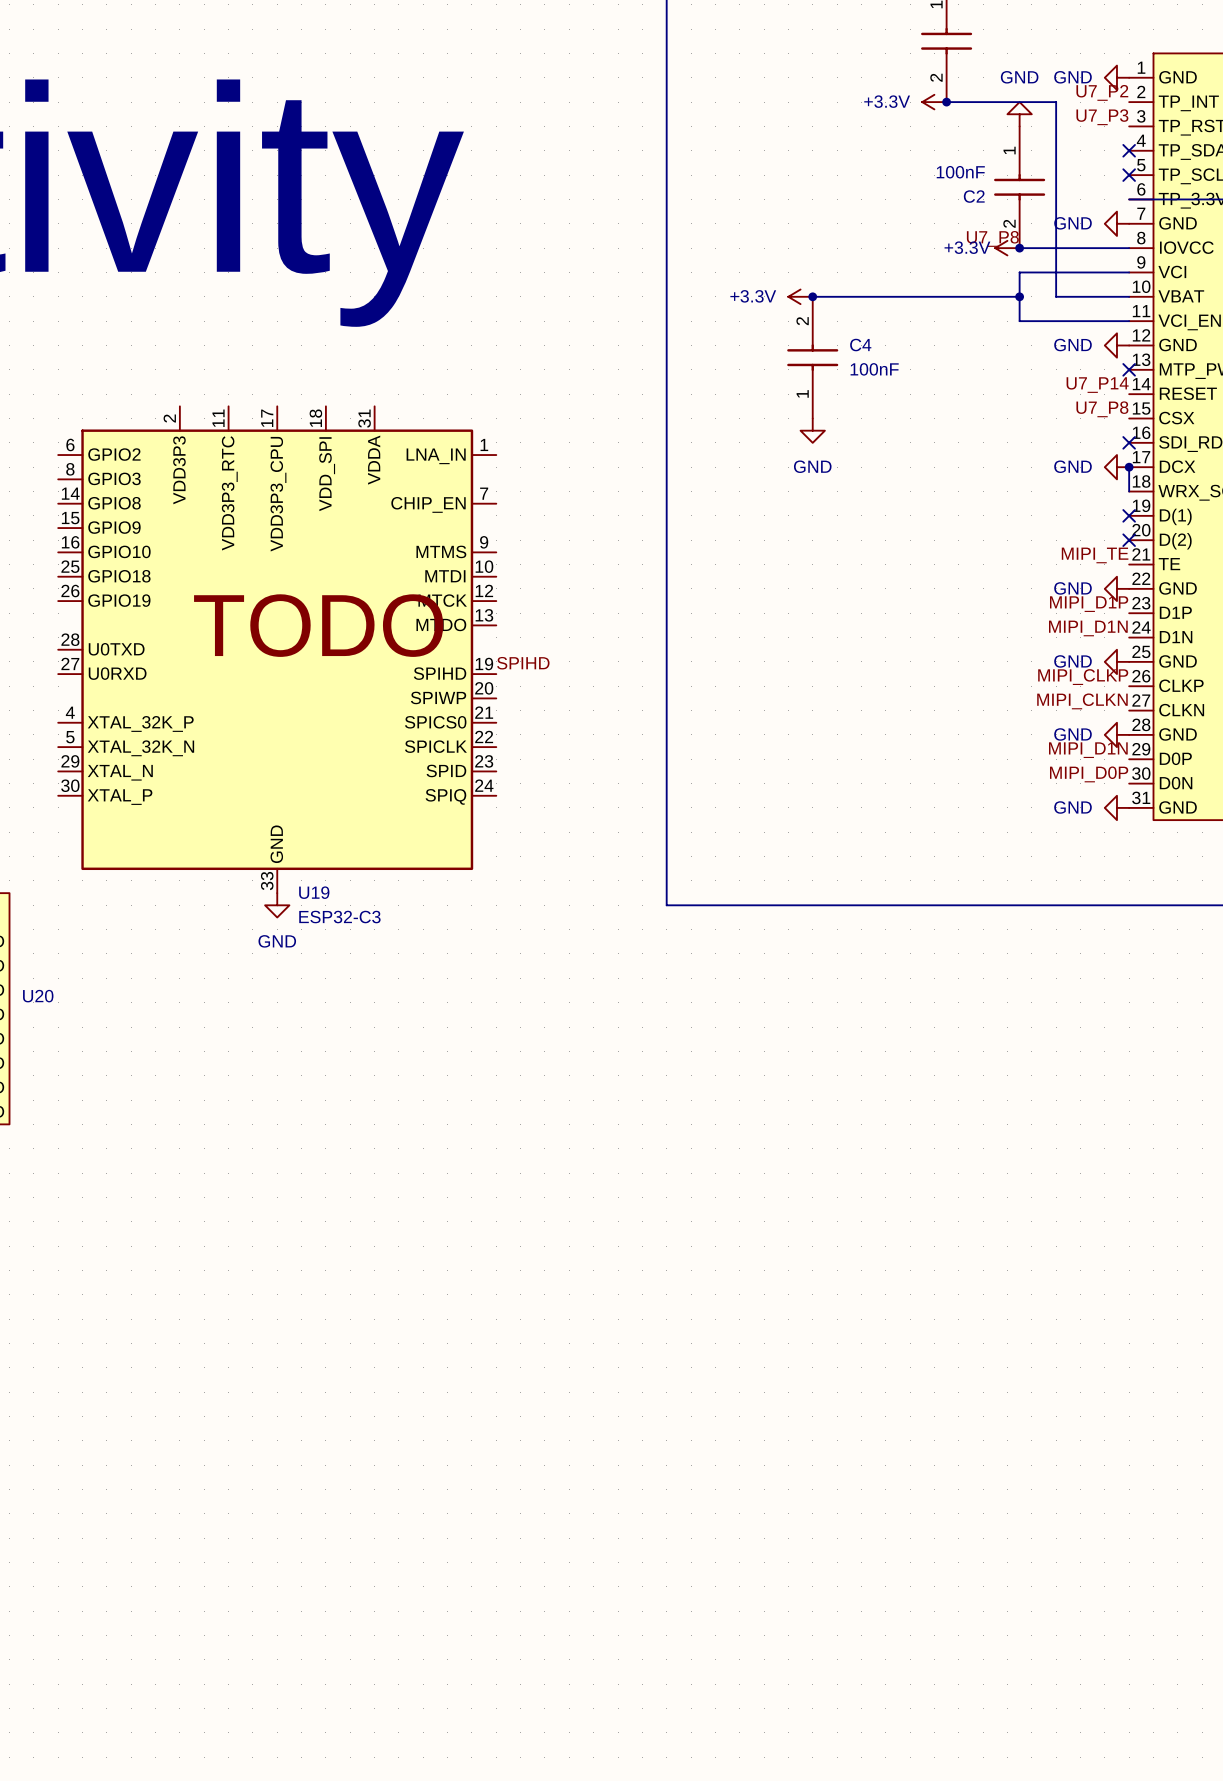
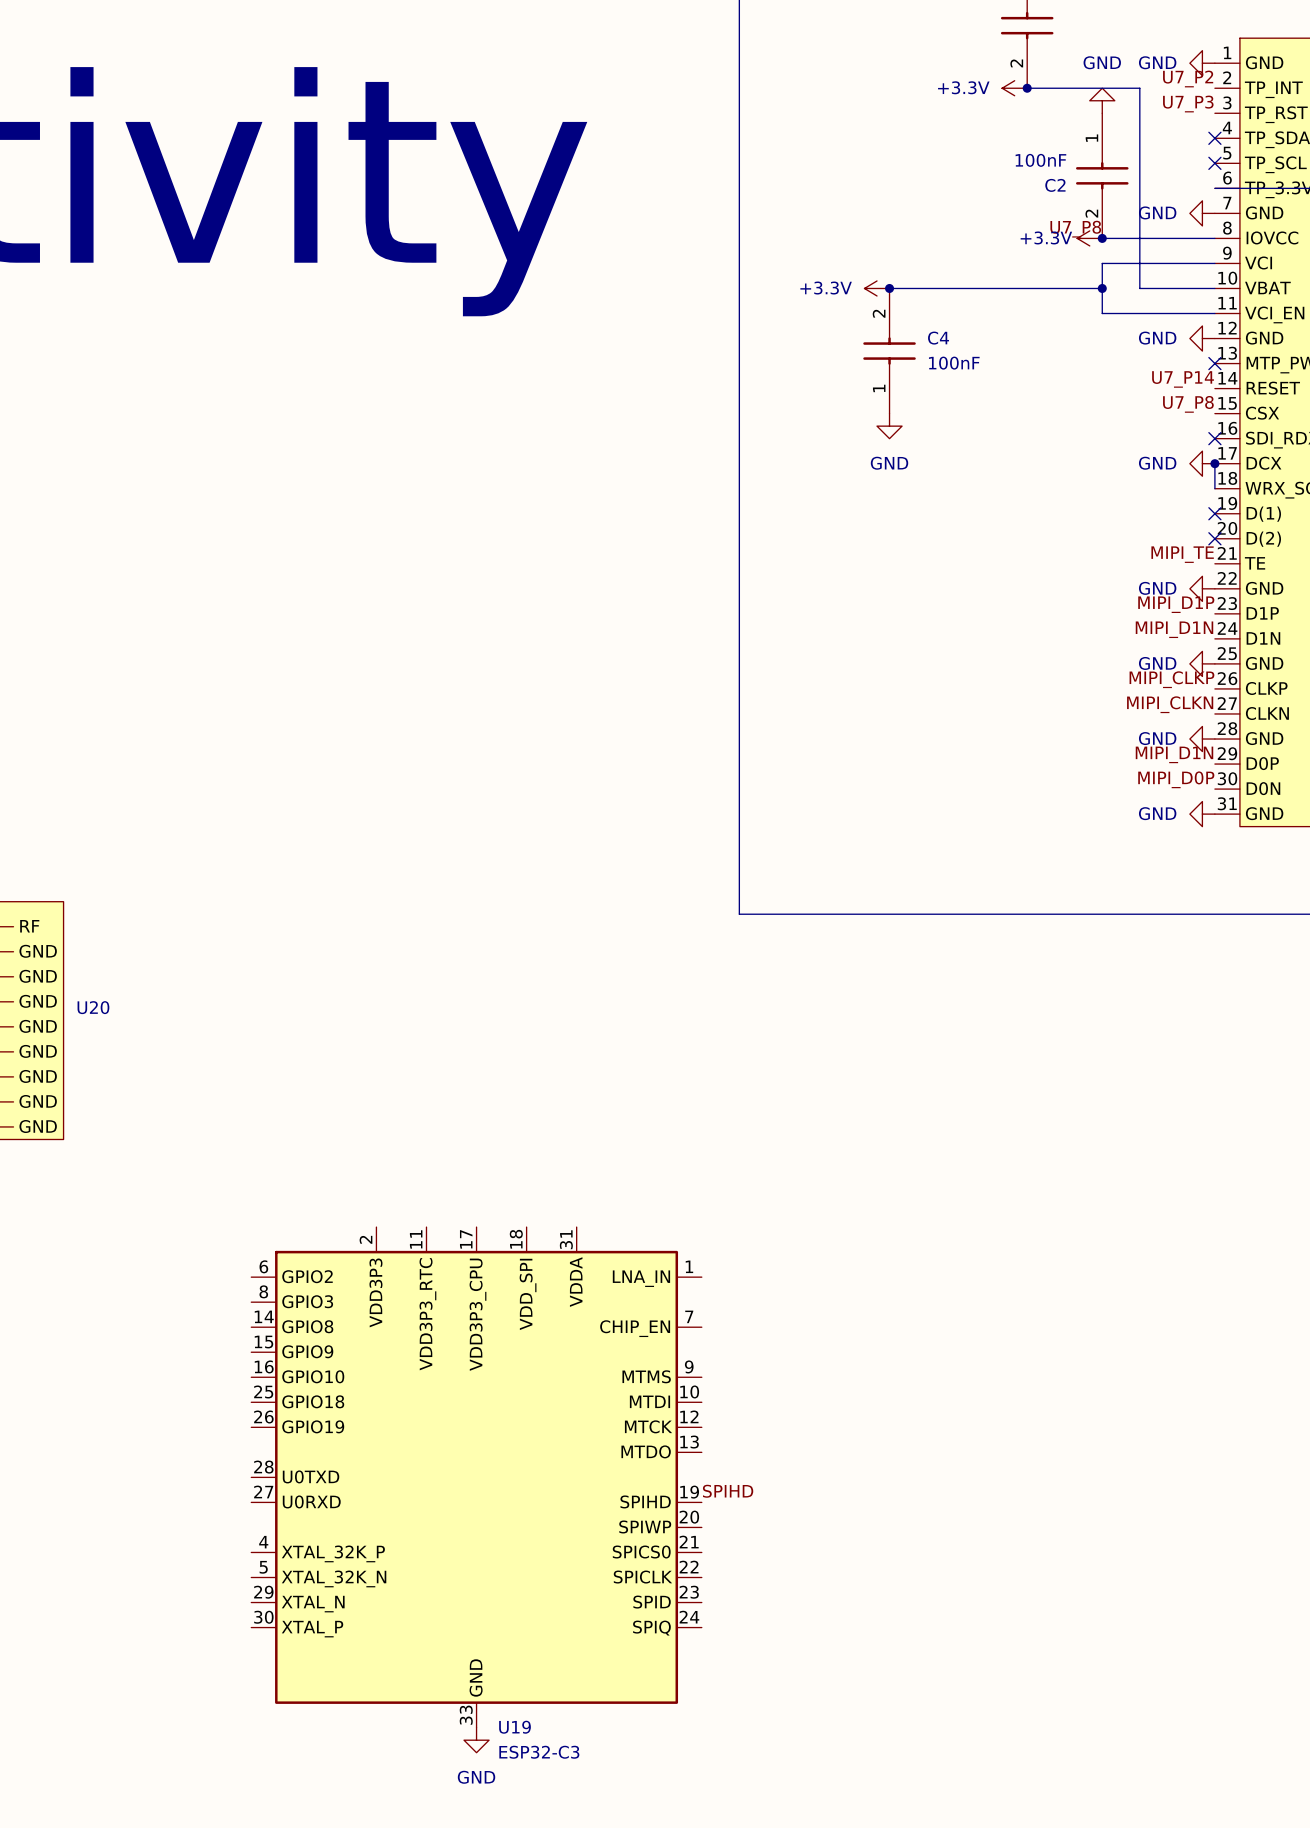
label: TODO (318, 625) -> none
U19 position: (277, 649) -> (476, 1477)
label: SPIHD (523, 663) -> none
power symbol: GND (277, 905) -> none
label: none -> SPIHD (728, 1491)
power symbol: none -> GND (476, 1740)

